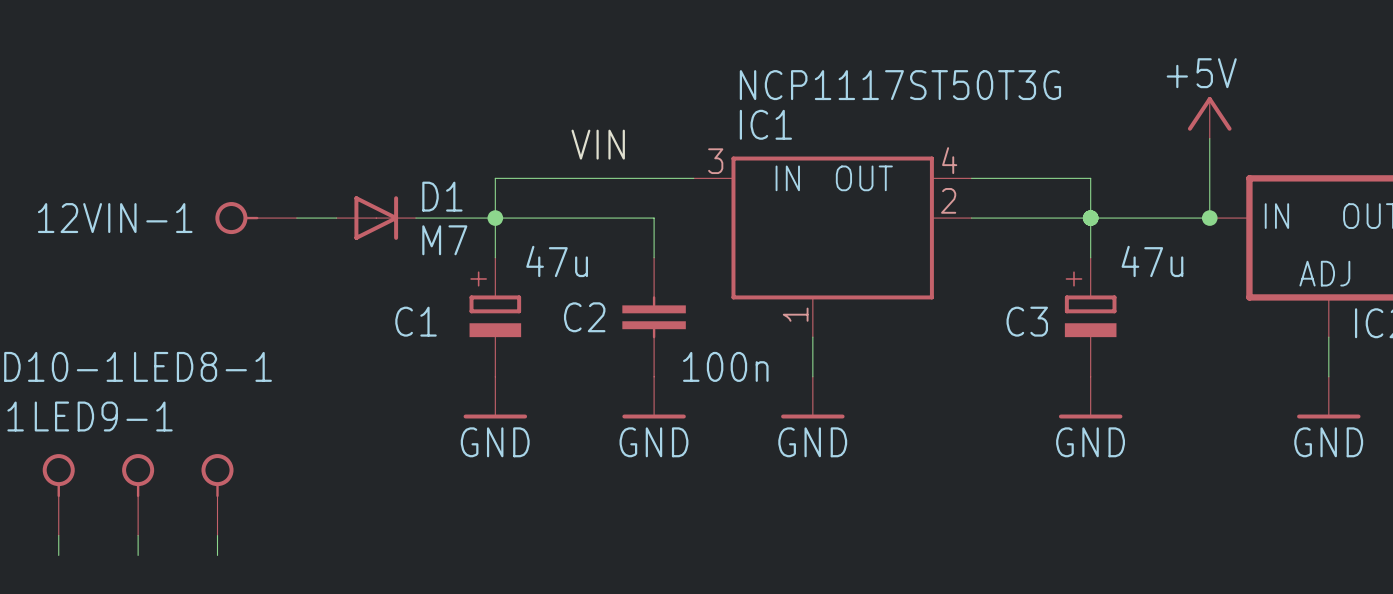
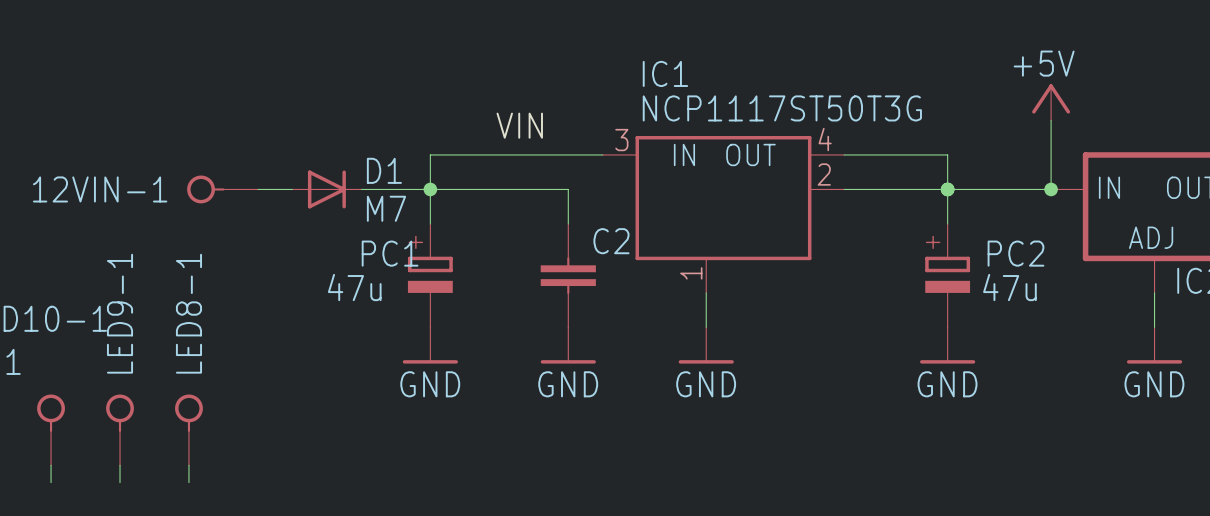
IC1 value position: NCP1117ST50T3G (900, 85) -> NCP1117ST50T3G (782, 108)
IC1 name position: IC1 (765, 124) -> IC1 (665, 73)
C1 value position: 47u (557, 261) -> 47u (354, 287)
C3 value position: 47u (1152, 261) -> 47u (1009, 287)
C2 name position: C2 (584, 317) -> C2 (611, 241)
C1 name: C1 (416, 321) -> PC1 (390, 253)
C3 name: C3 (1027, 321) -> PC2 (1015, 253)
LED8-1 name rotation: 0° (202, 366) -> 90° counterclockwise (188, 313)
C2 value: 100n (725, 366) -> none
LED9-1 name rotation: 0° (103, 416) -> 90° counterclockwise (120, 313)

